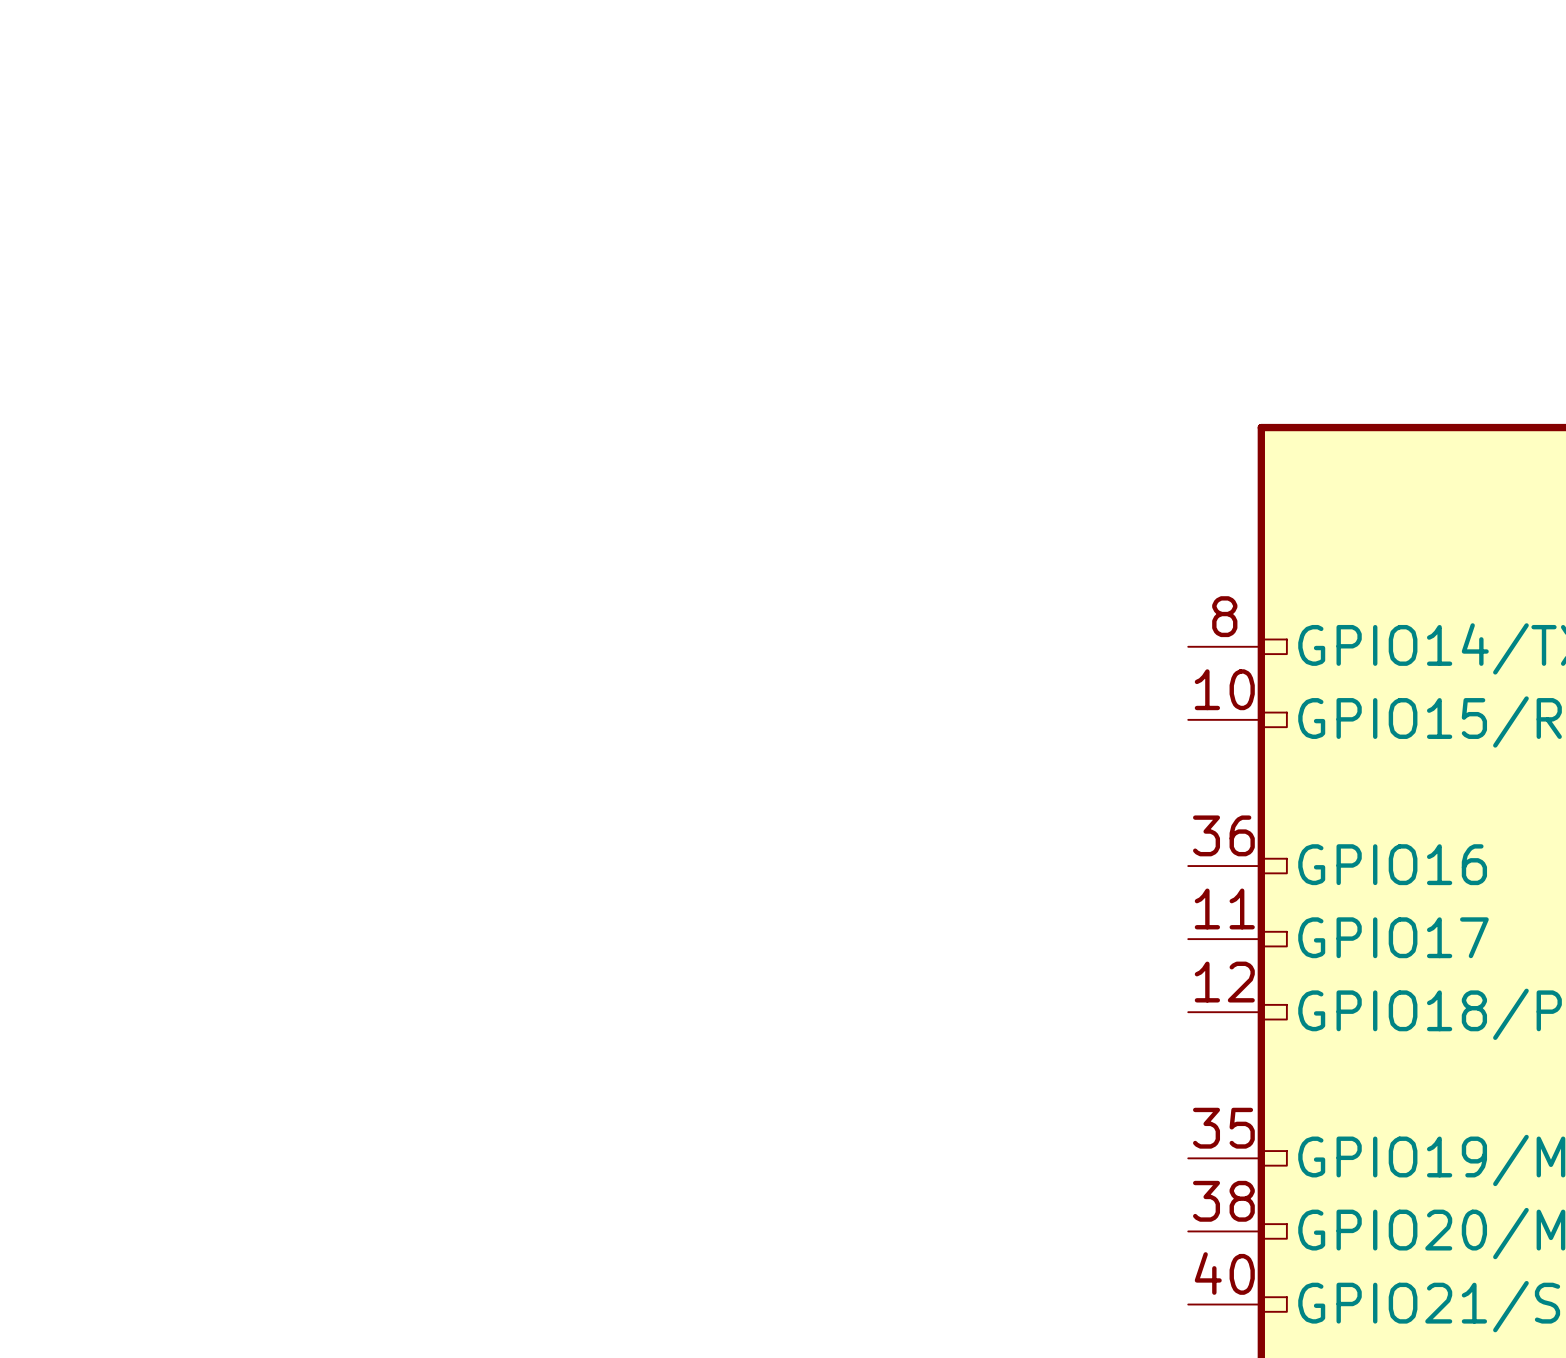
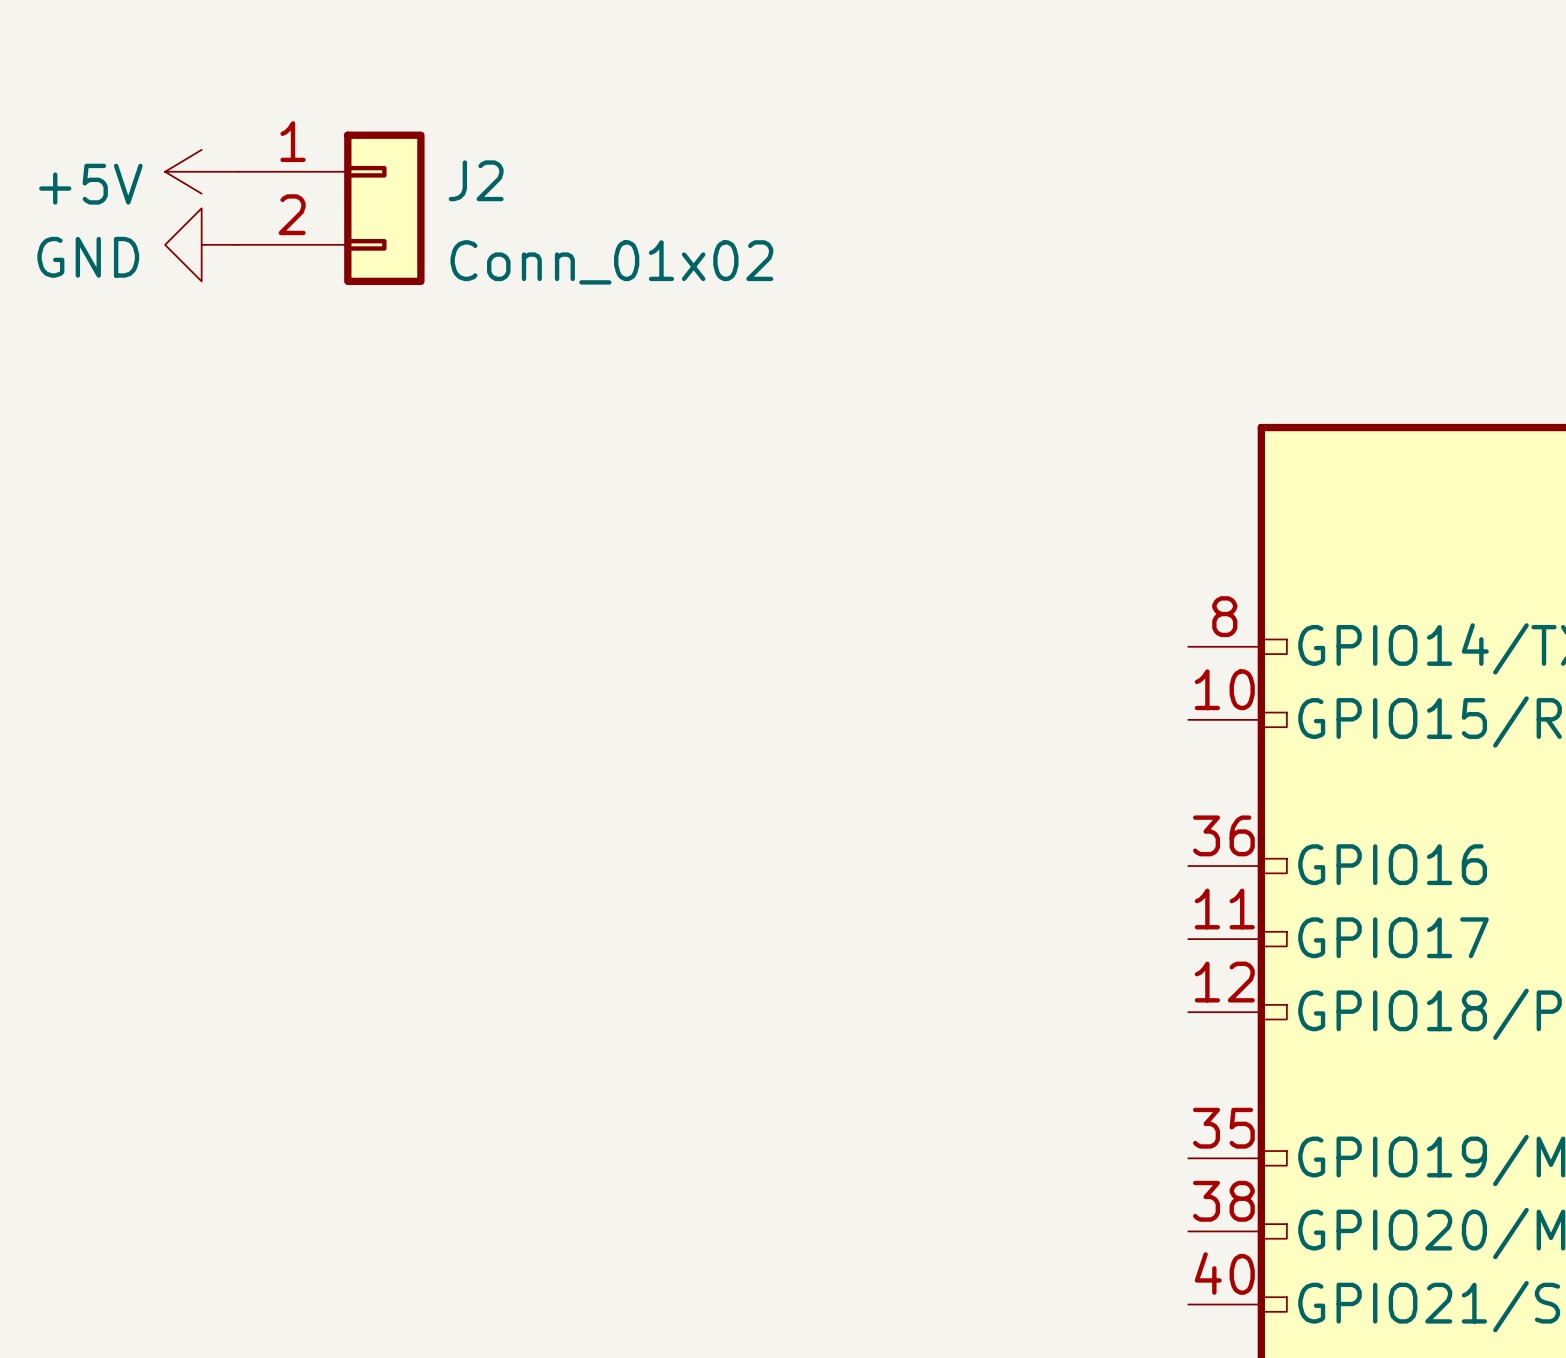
power symbol: none -> +5V (201, 171)
J2: none -> Conn_01x02 (331, 208)
power symbol: none -> GND (201, 244)

